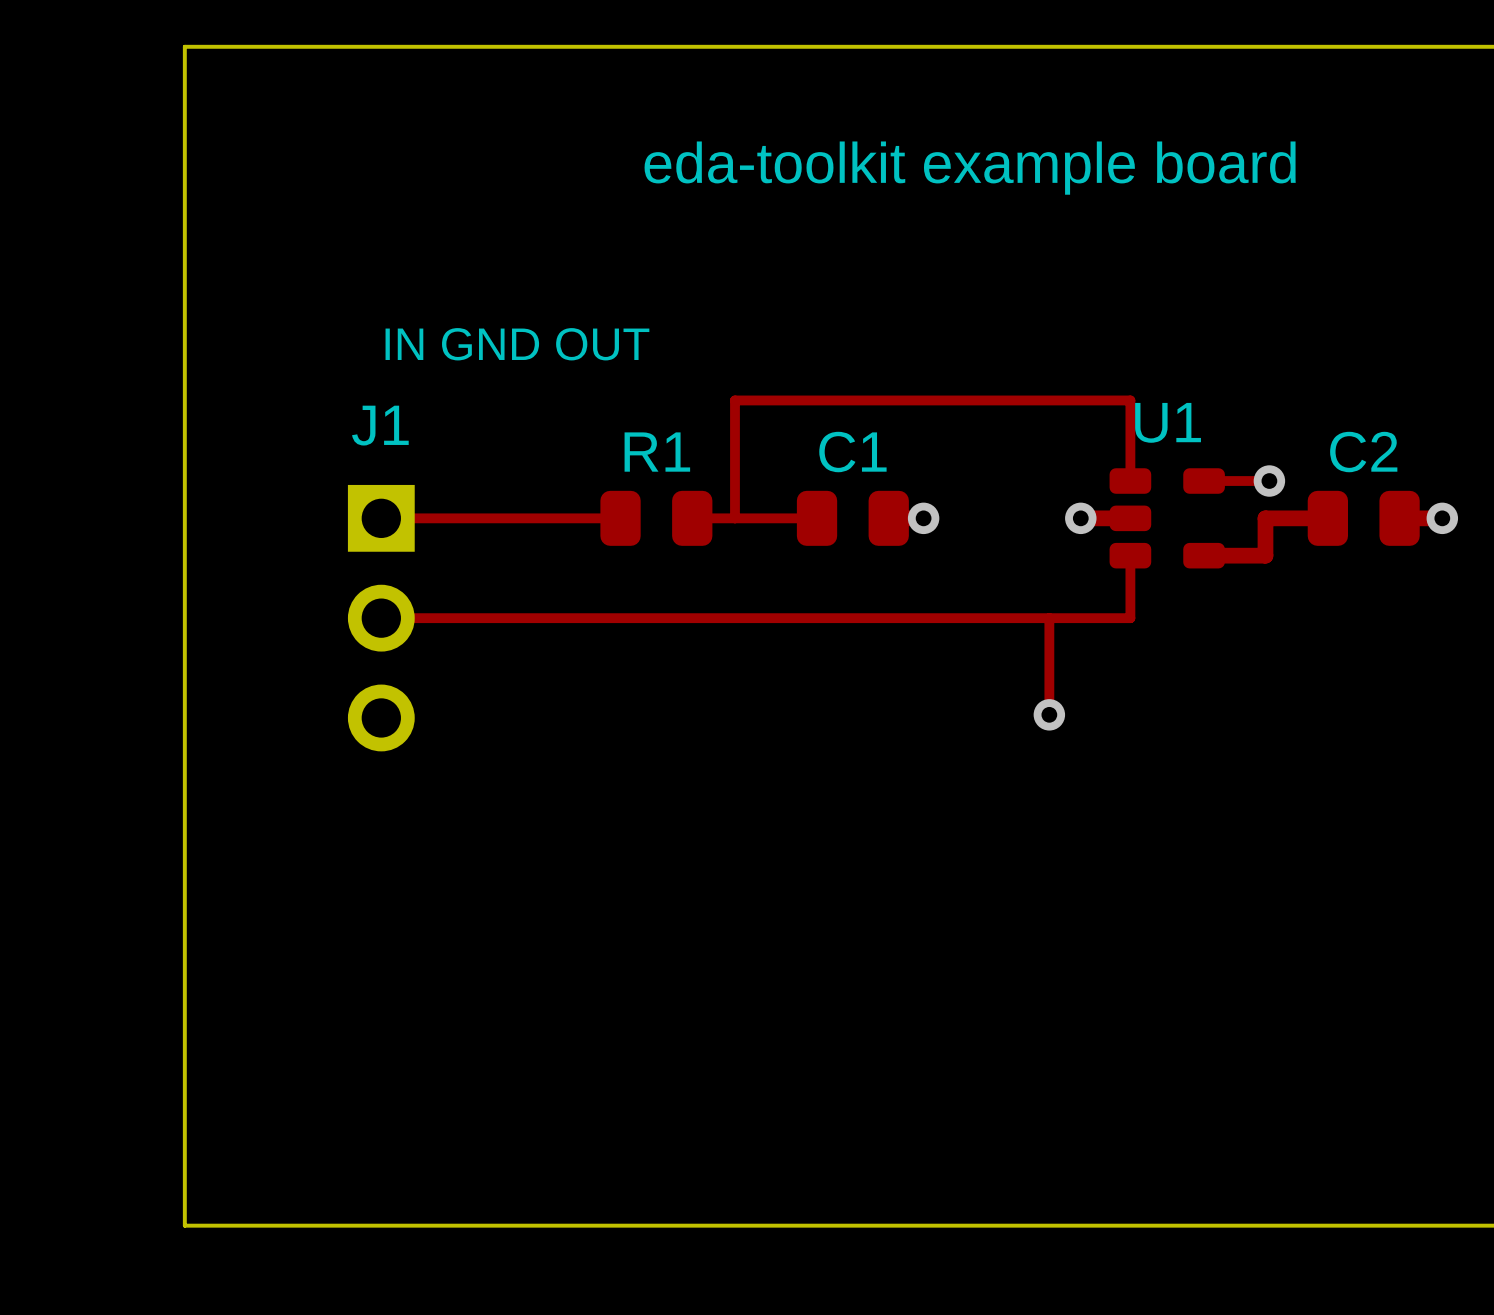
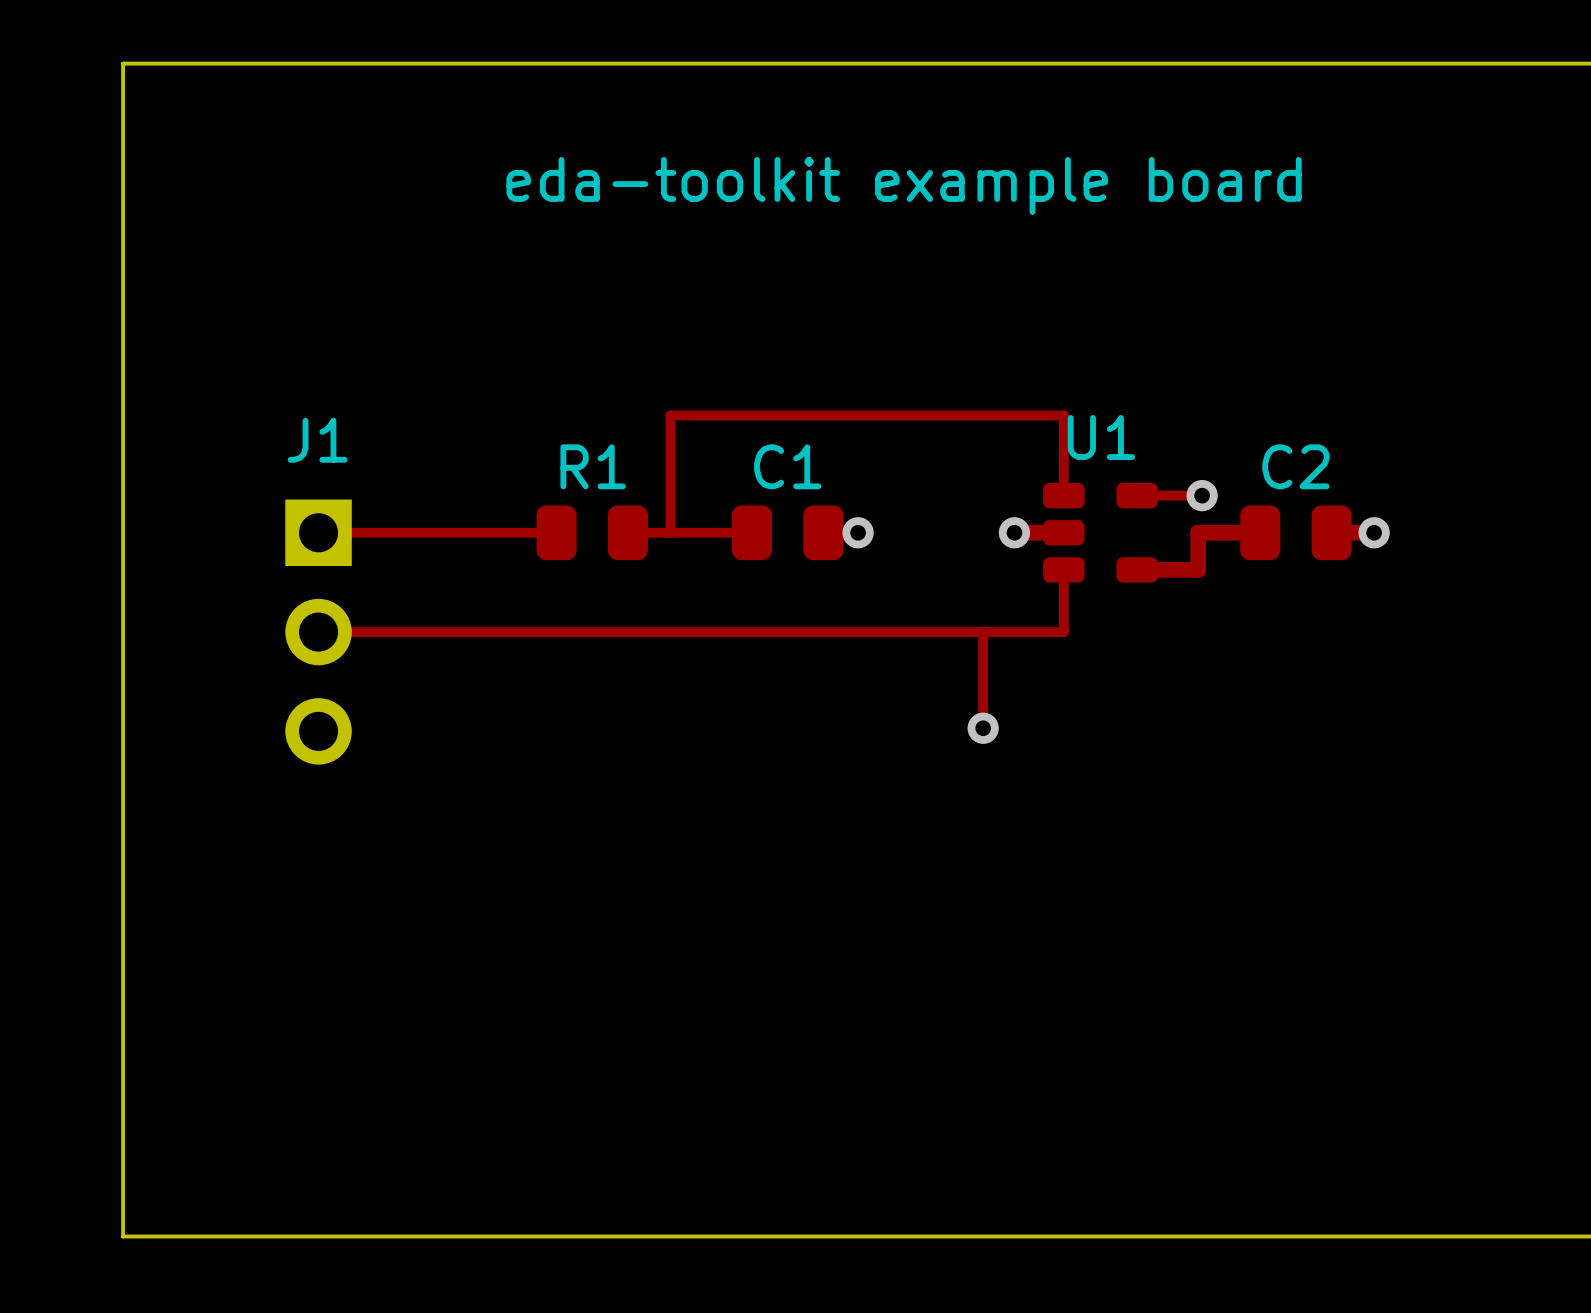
text: IN GND OUT (517, 344) -> none

